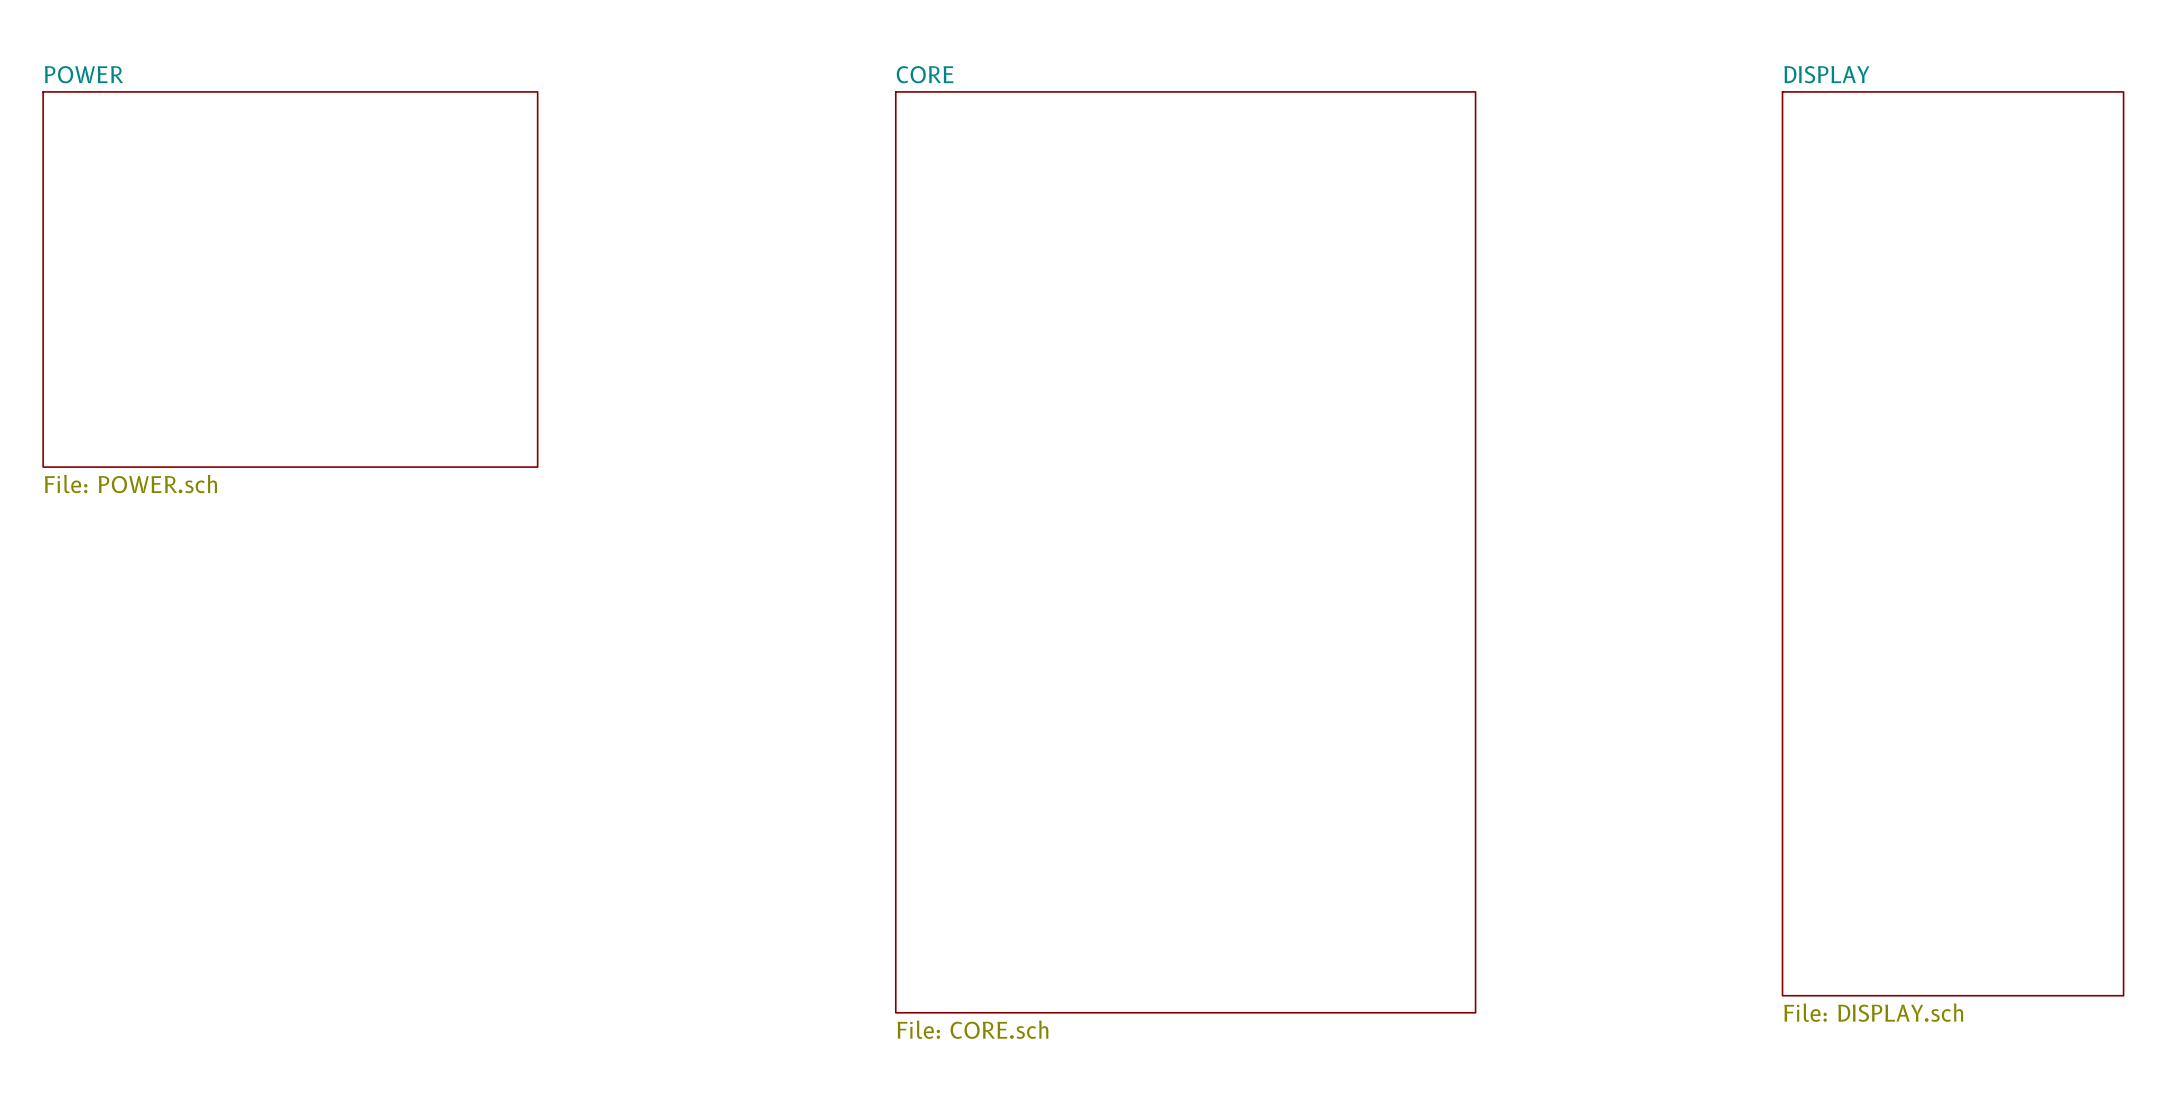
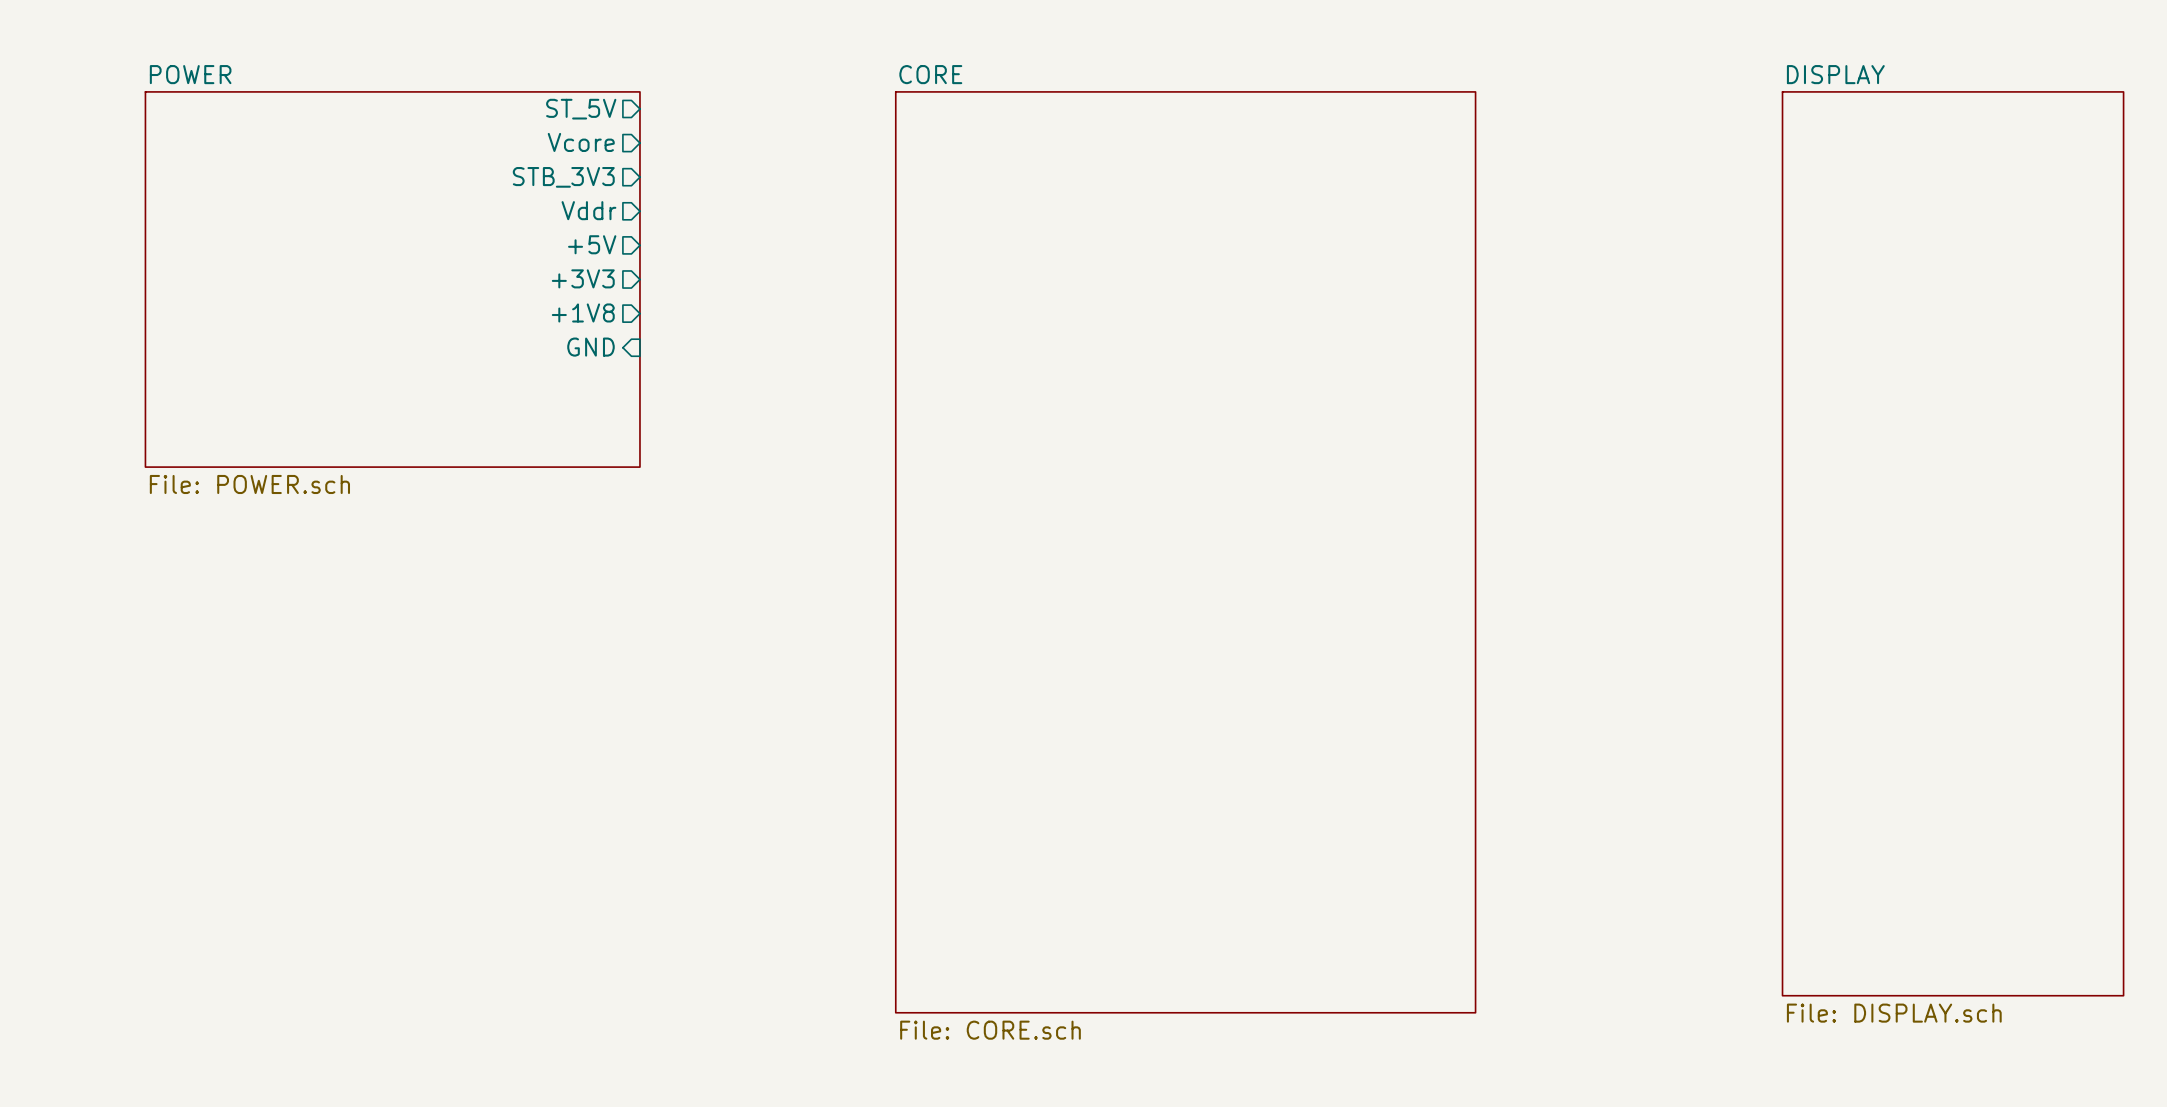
sheet pin: none -> ST_5V (581, 109)
sheet pin: none -> Vcore (581, 142)
sheet pin: none -> STB_3V3 (563, 177)
sheet pin: none -> Vddr (588, 210)
sheet pin: none -> +5V (592, 244)
sheet pin: none -> +3V3 (583, 278)
sheet POWER position: (290, 279) -> (392, 279)
sheet pin: none -> +1V8 (583, 312)
sheet pin: none -> GND (590, 347)

